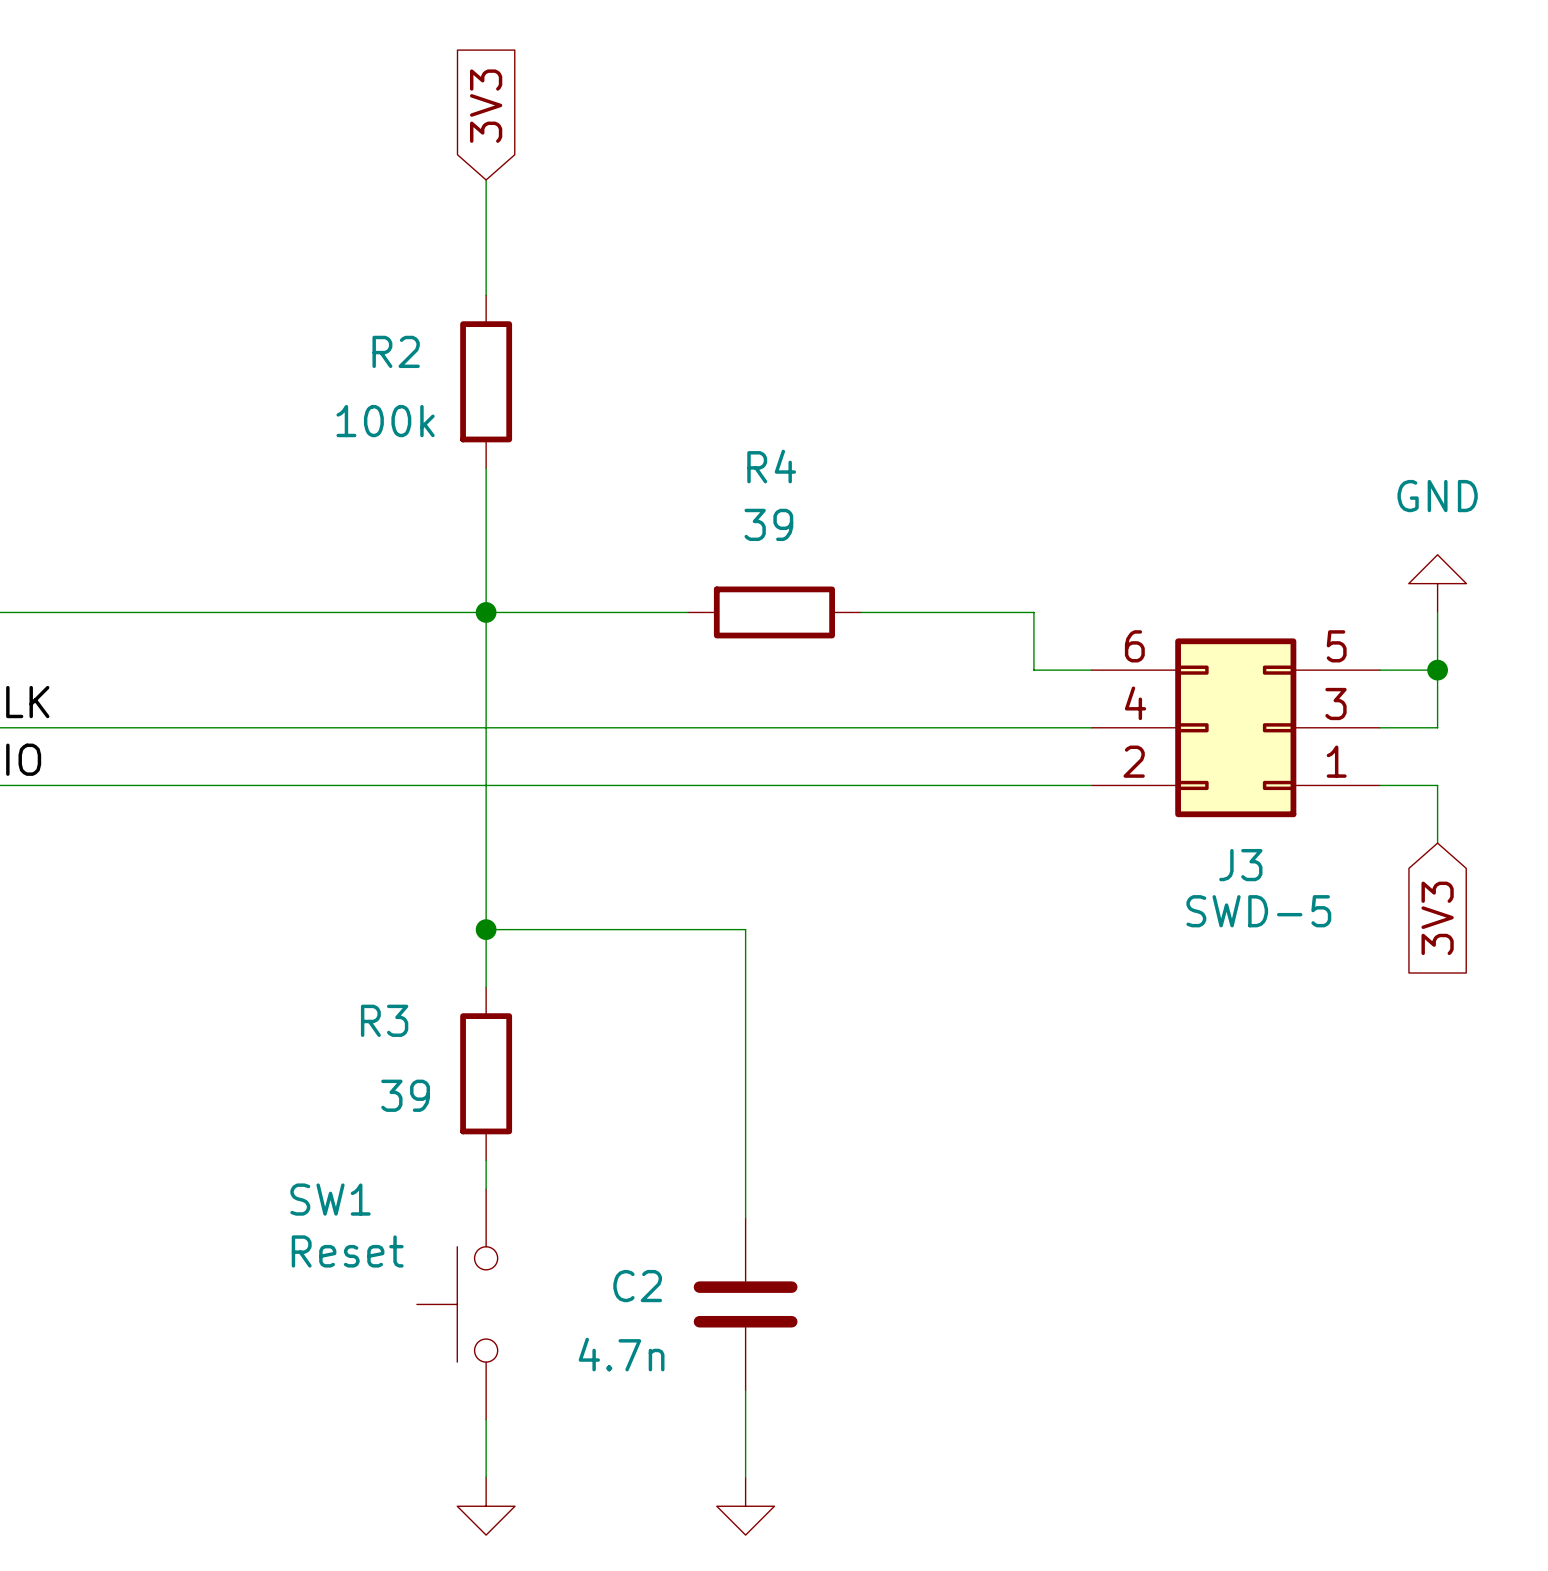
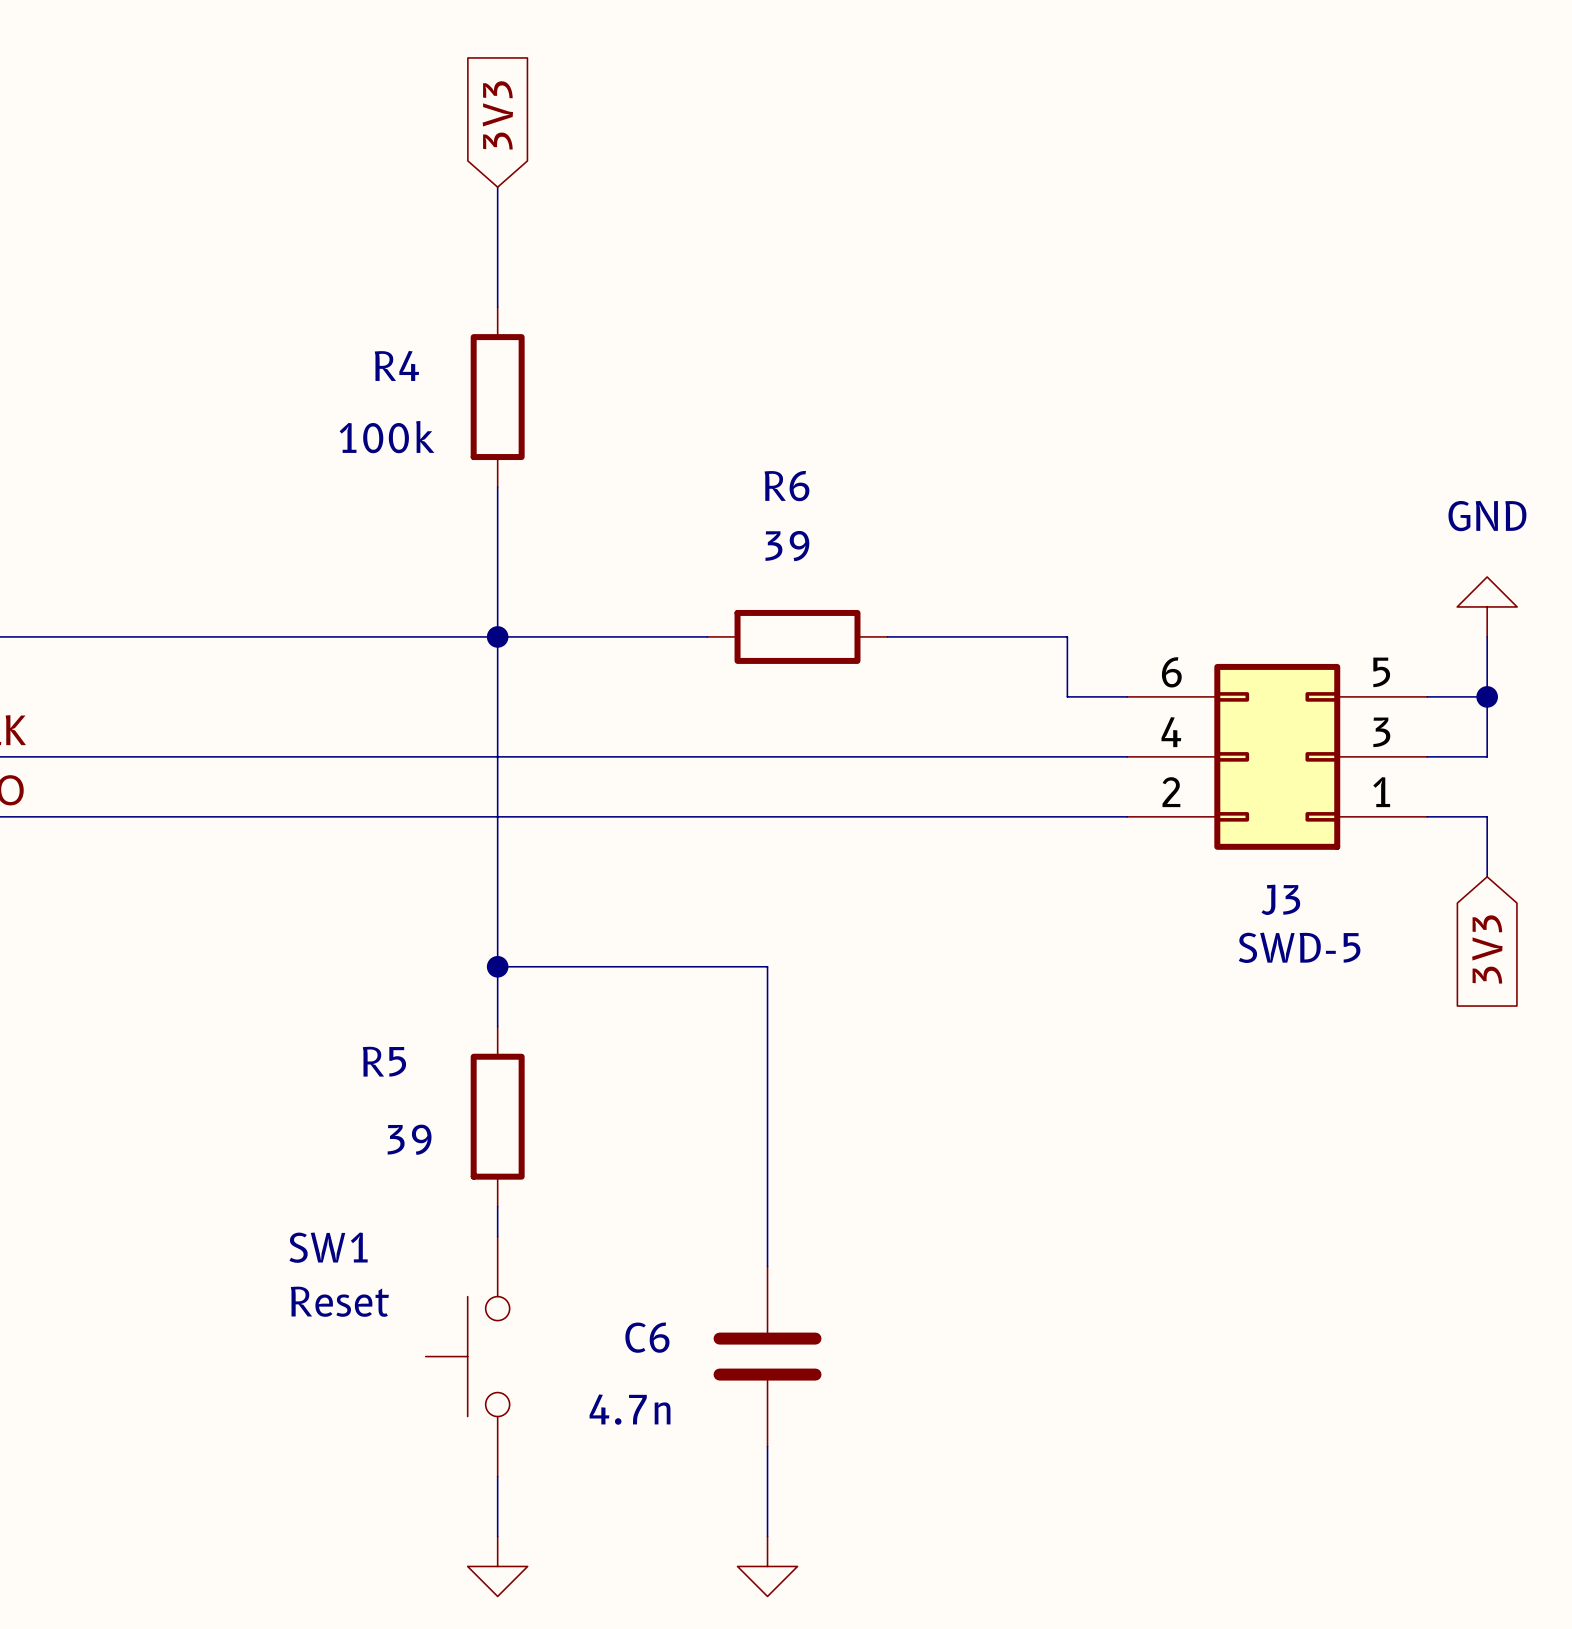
R2 name: R2 (396, 351) -> R4 (396, 365)
R4 name: R4 (771, 466) -> R6 (787, 486)
R3 name: R3 (384, 1020) -> R5 (384, 1061)
C2 name: C2 (637, 1286) -> C6 (647, 1337)

